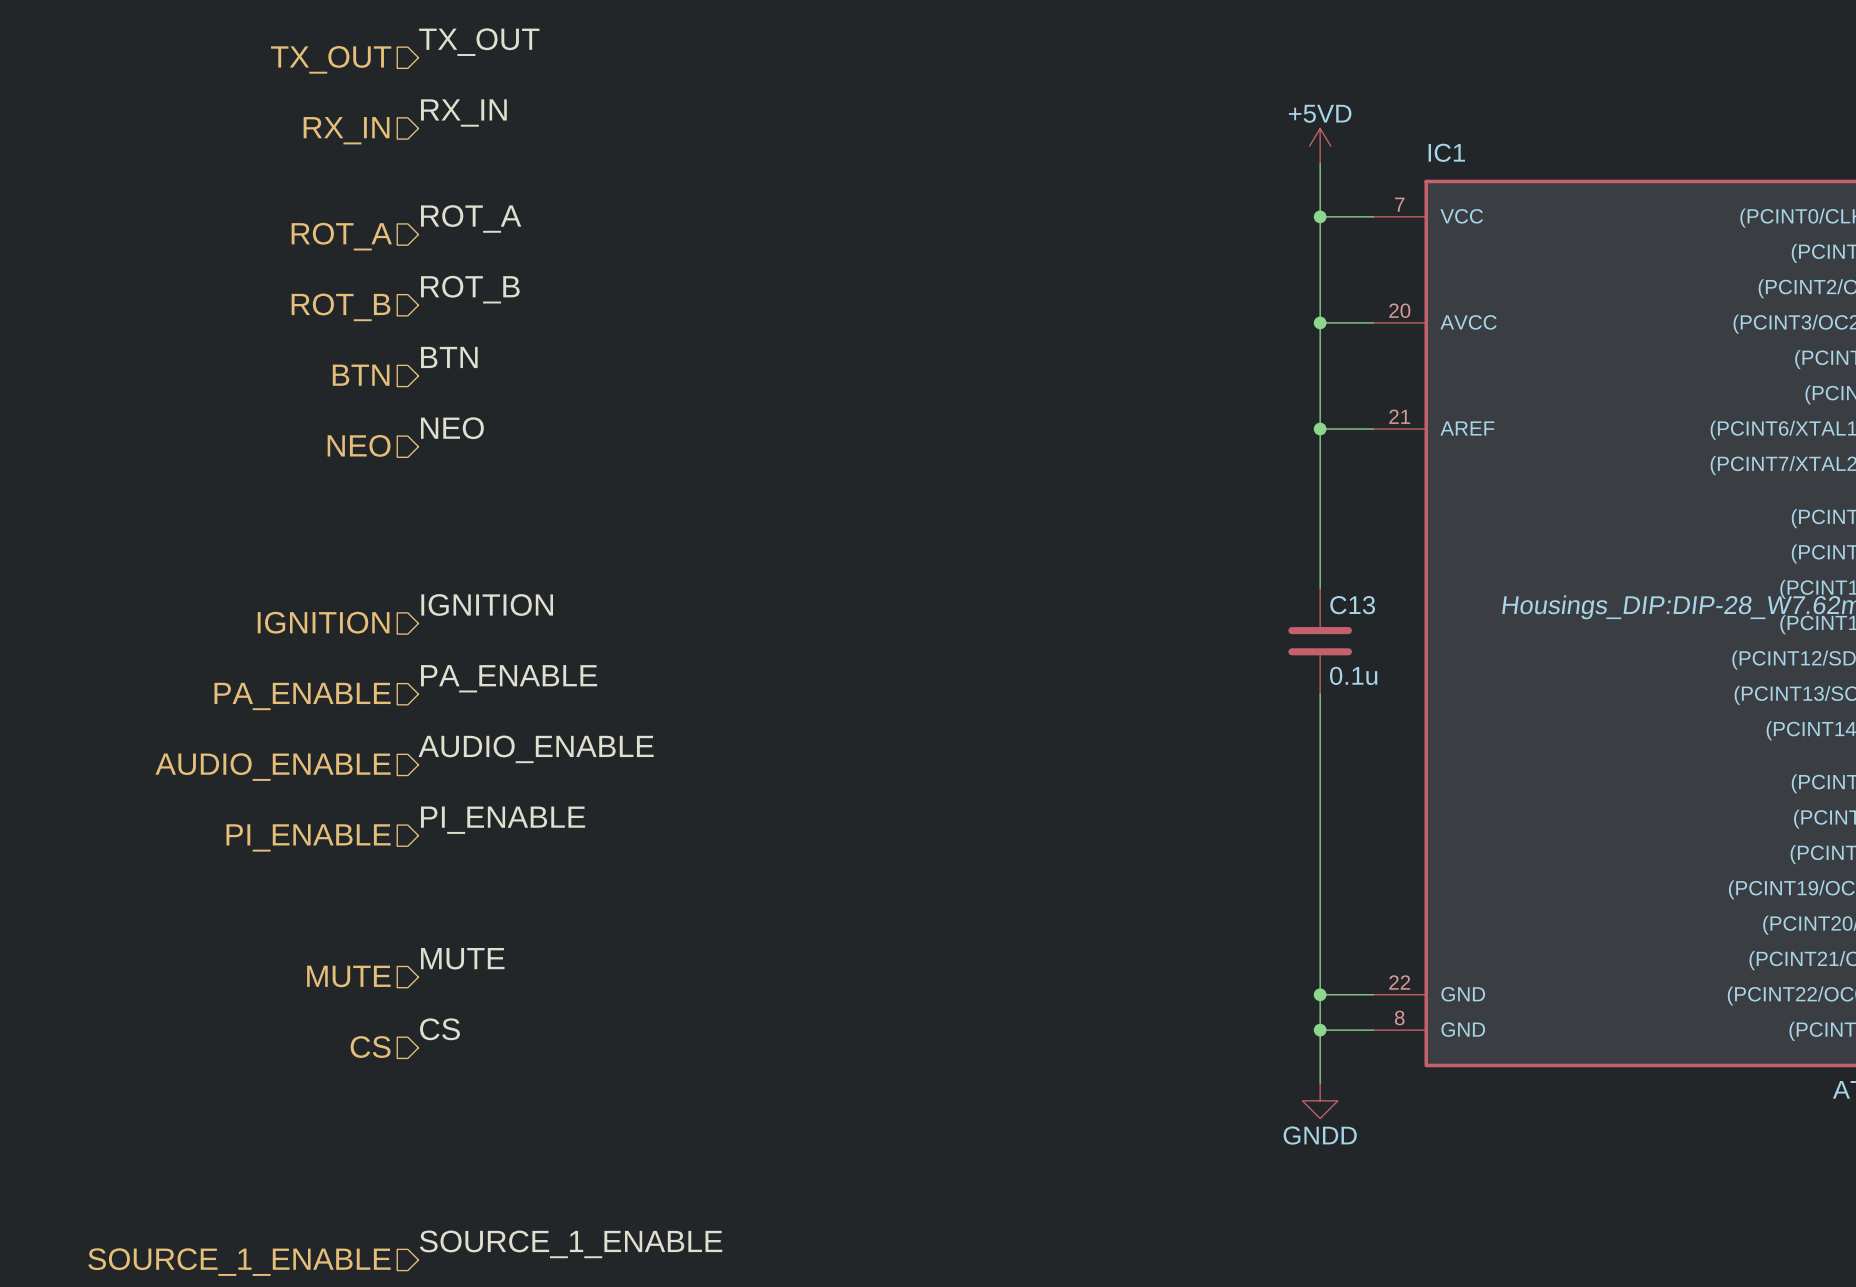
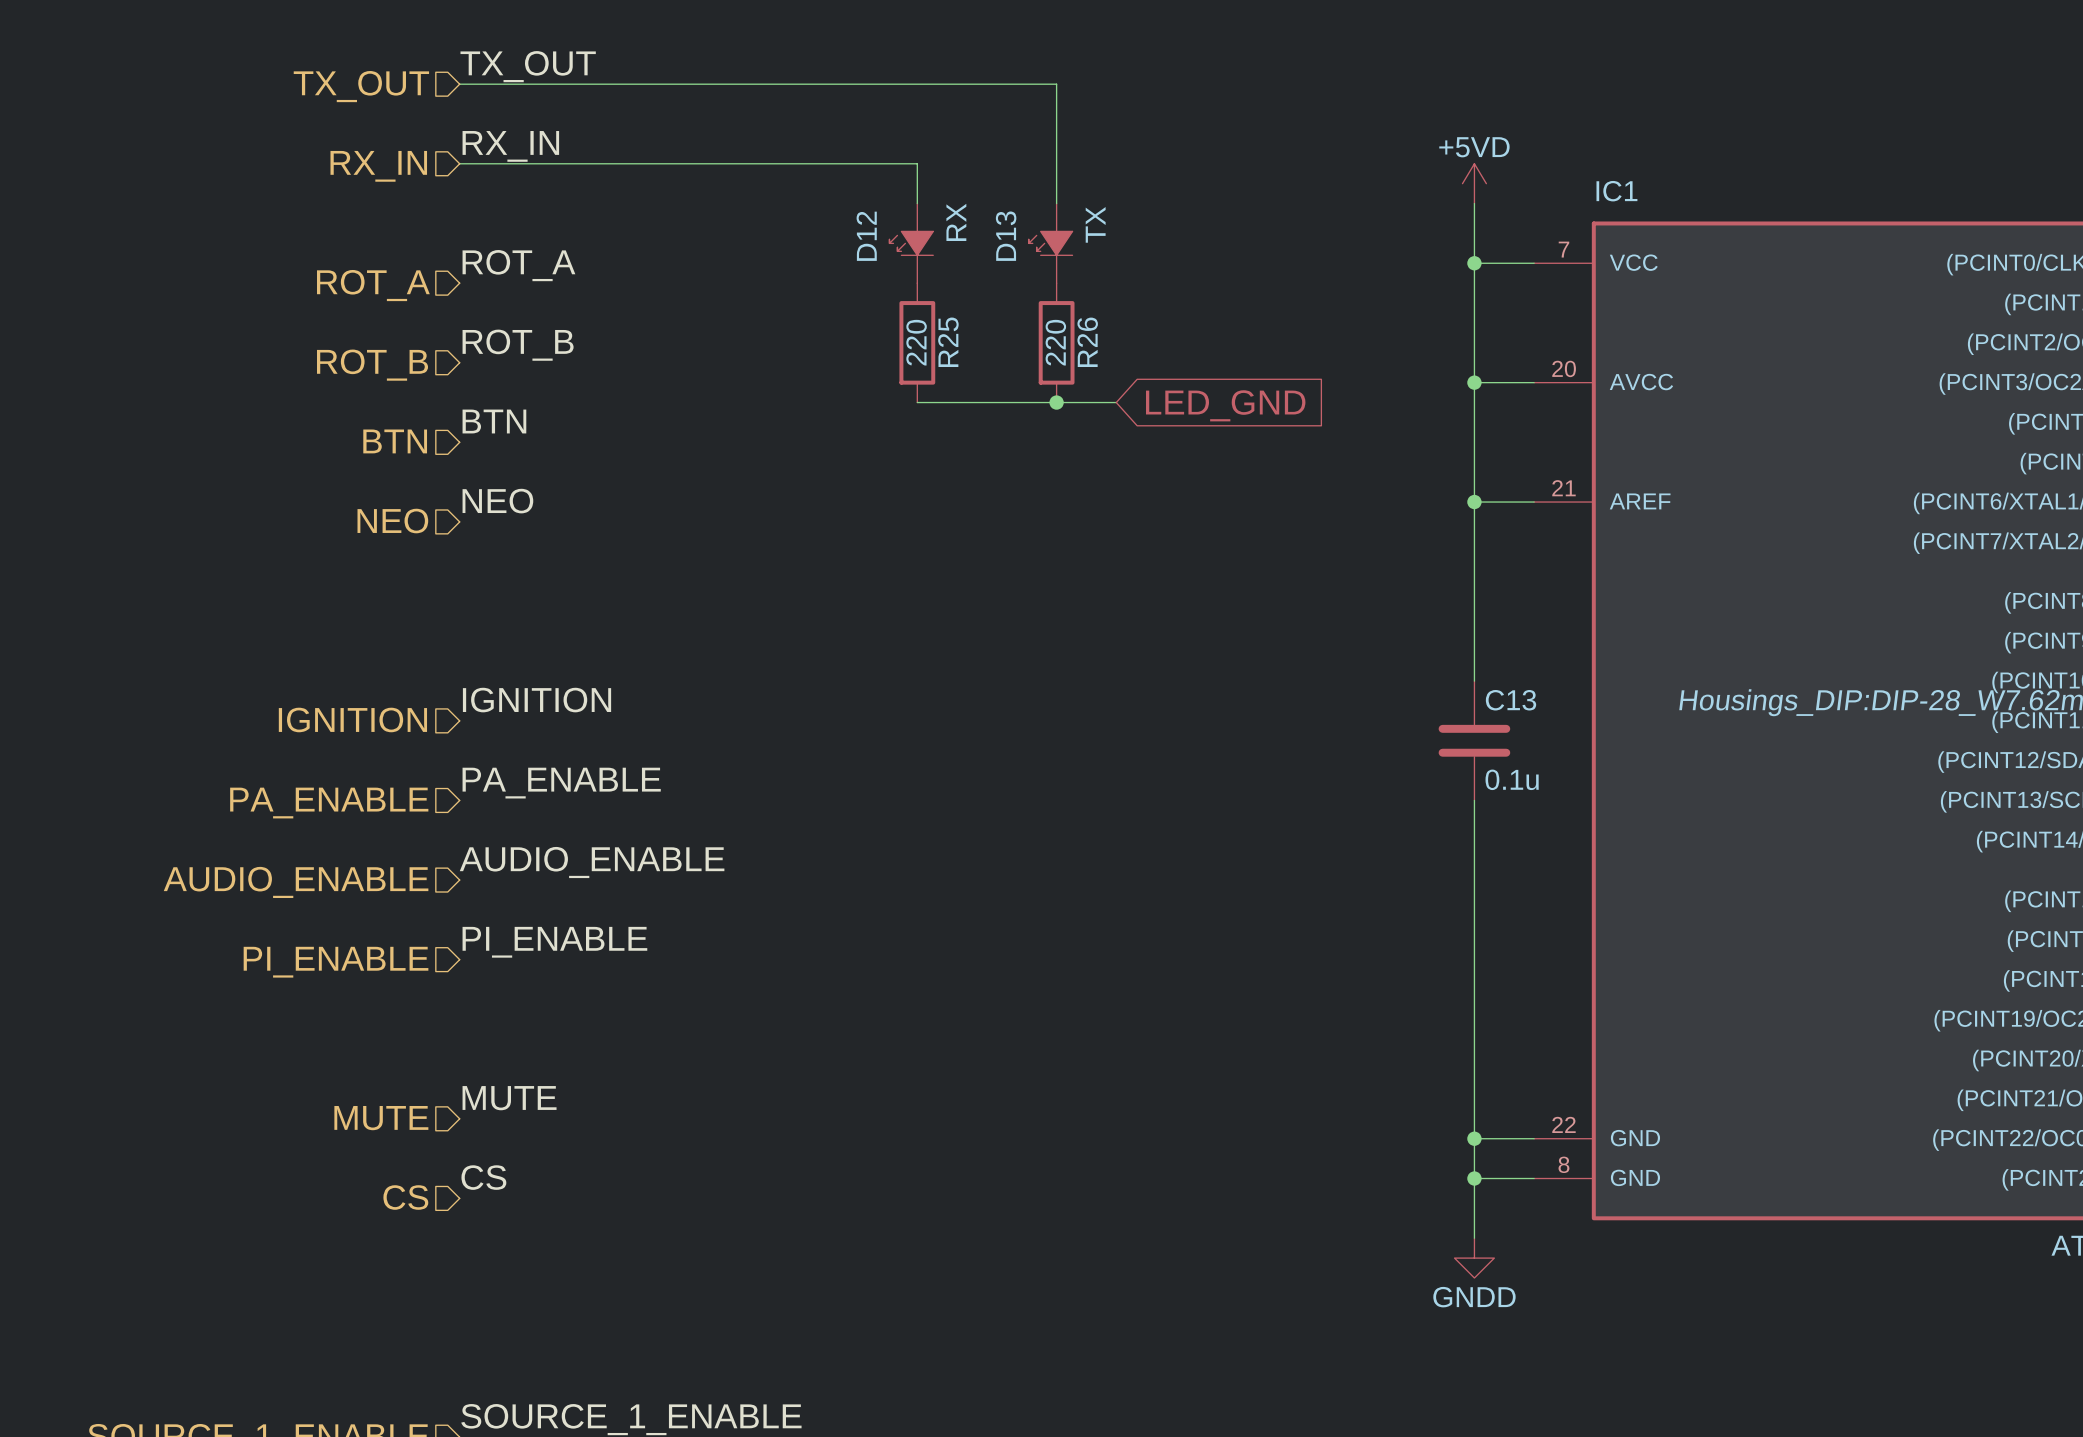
wire: none -> (459, 84) (1056, 84) (1056, 203)
wire: none -> (459, 163) (917, 163) (917, 203)
D12: none -> RX (911, 243)
D13: none -> TX (1050, 243)
R25: none -> 220 (917, 342)
R26: none -> 220 (1056, 342)
wire: none -> (917, 402) (1116, 402)
junction: none -> (1056, 402)
global label: none -> LED_GND (1225, 405)

